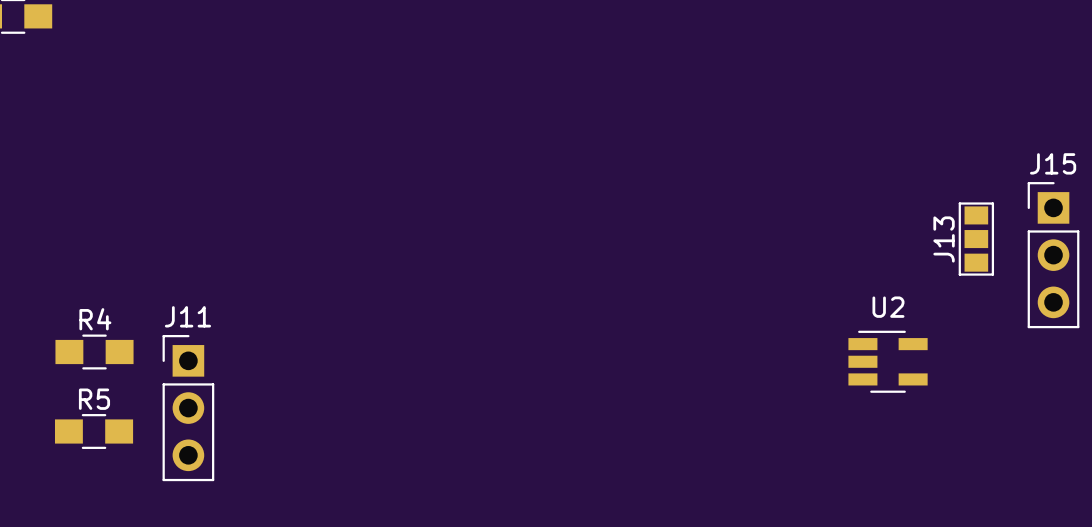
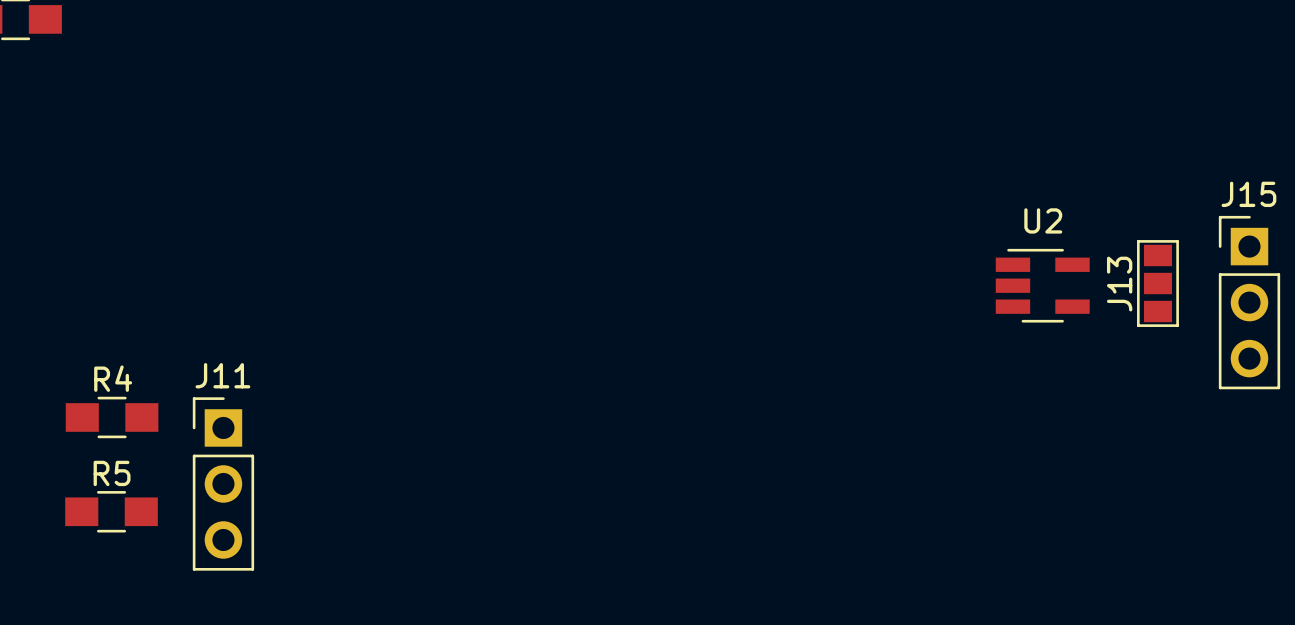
U2 position: (888, 361) -> (1042, 285)

